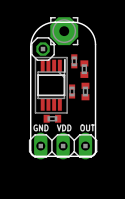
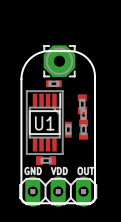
part: (43, 49) -> none
part: none -> (53, 83)
part: (74, 61) -> none
part: none -> (83, 114)
U1 name: none -> U1 (44, 123)

